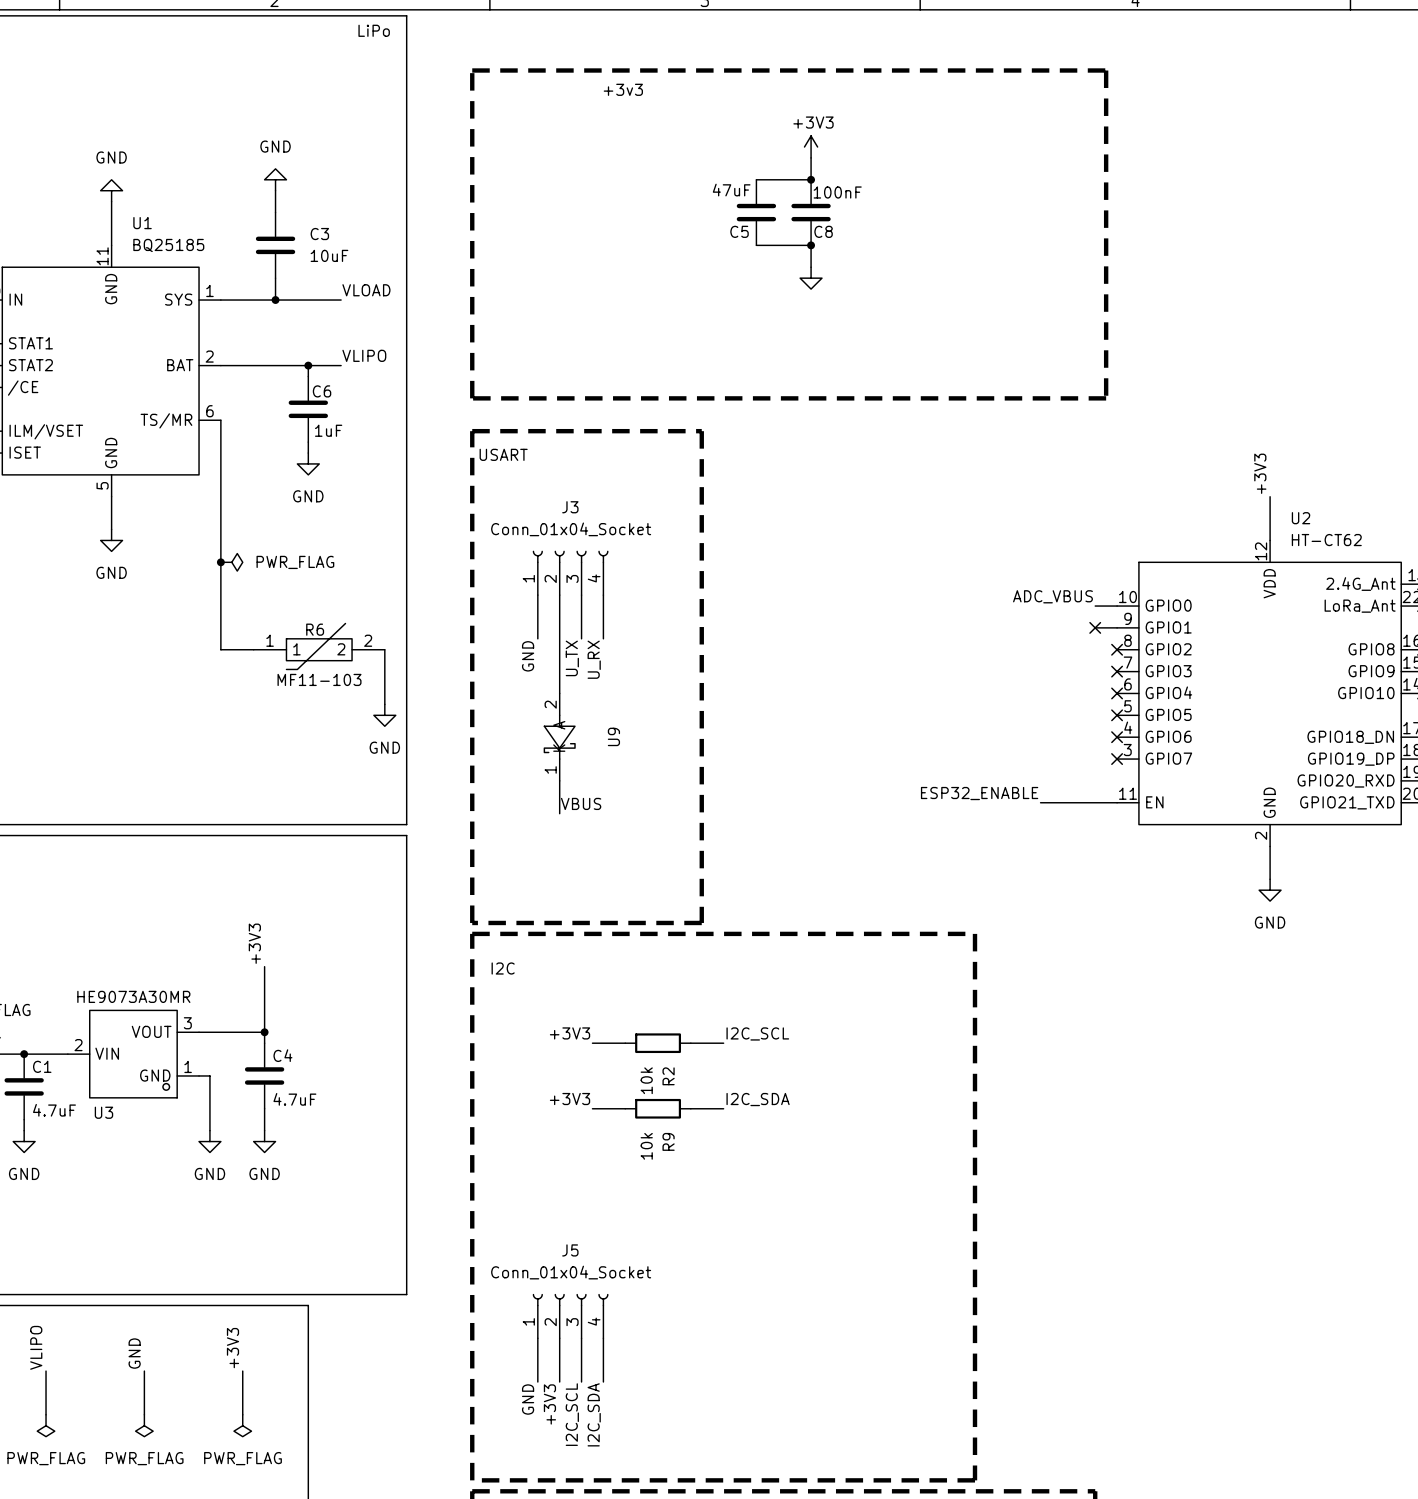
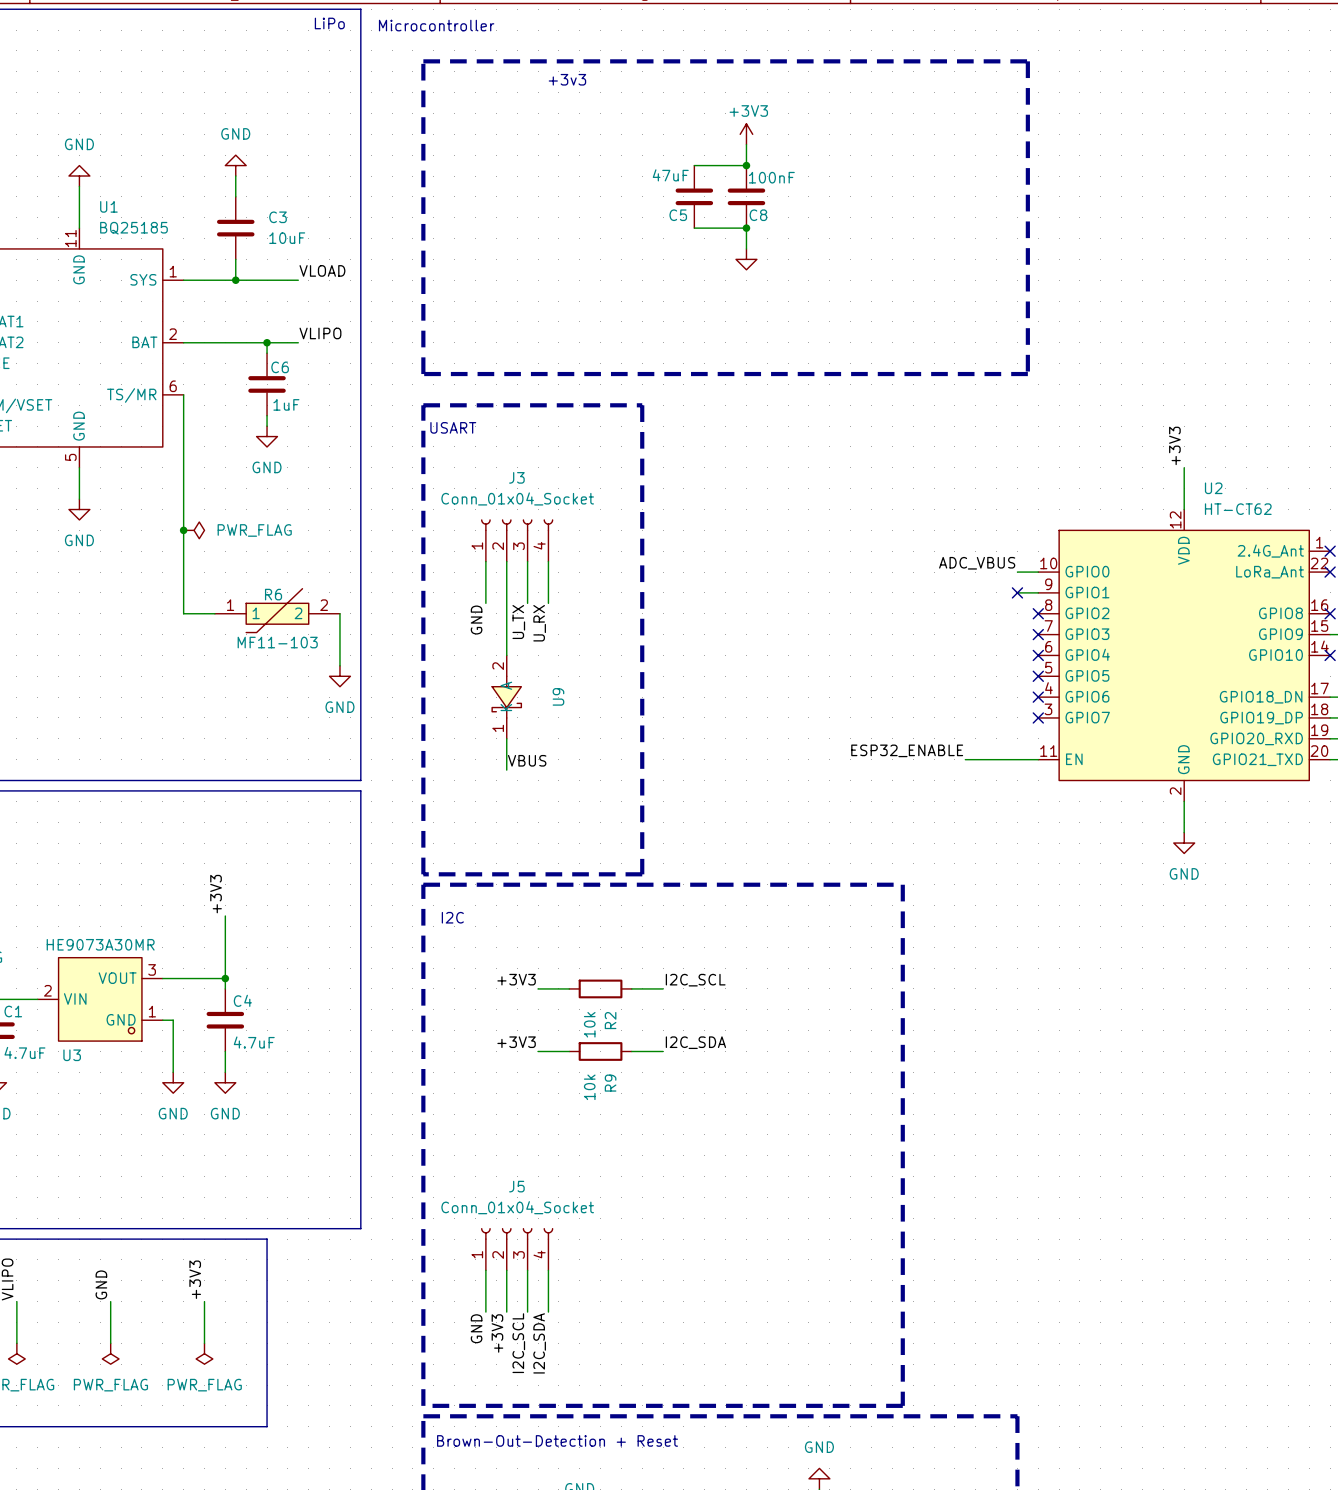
text: none -> Microcontroller (436, 25)

